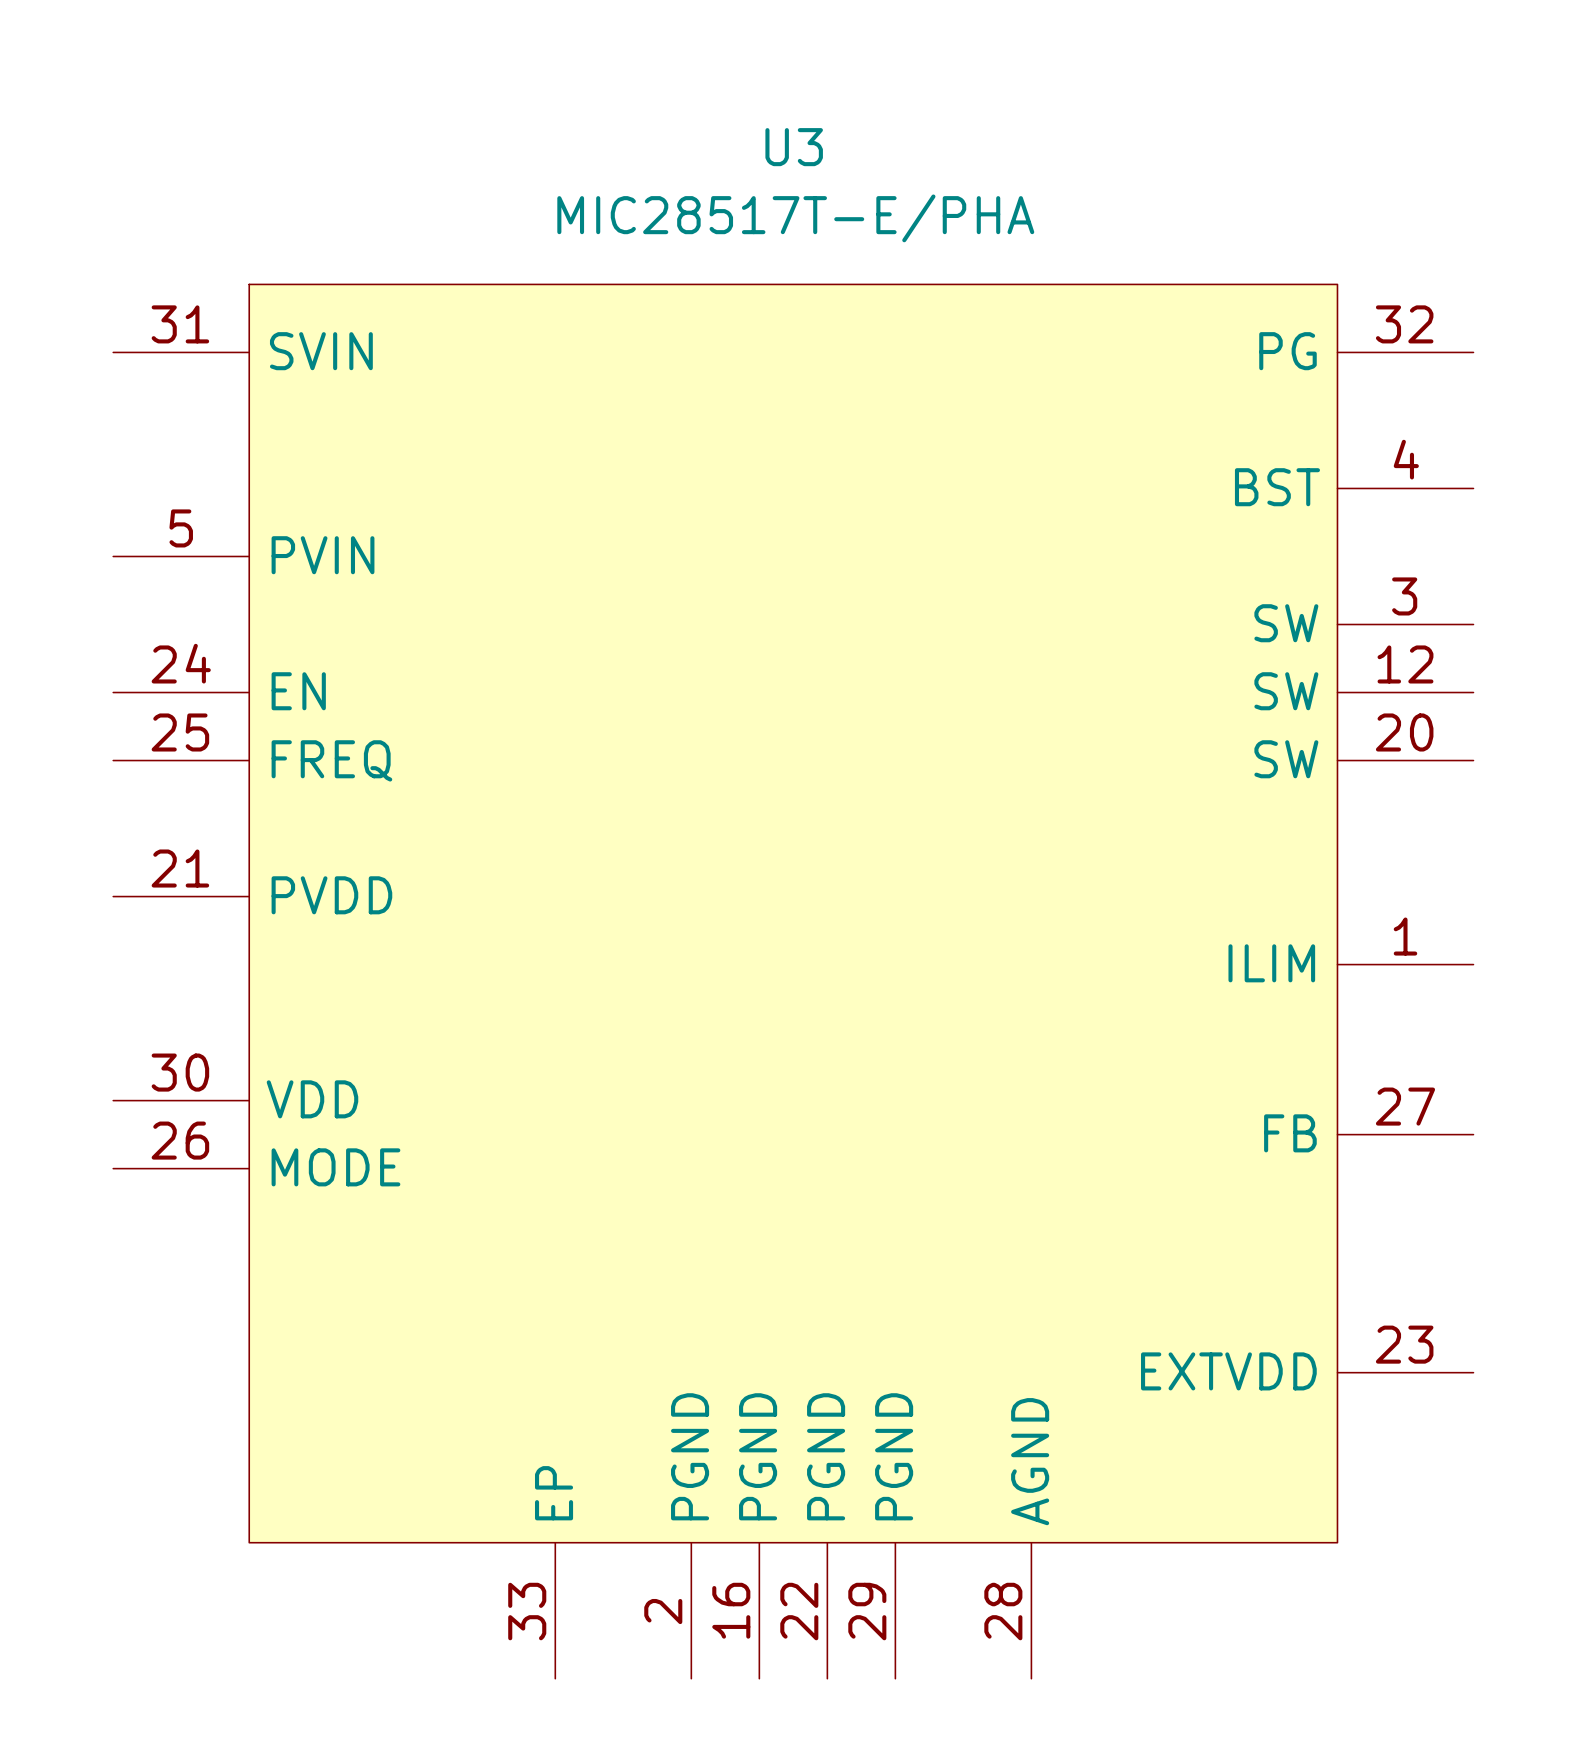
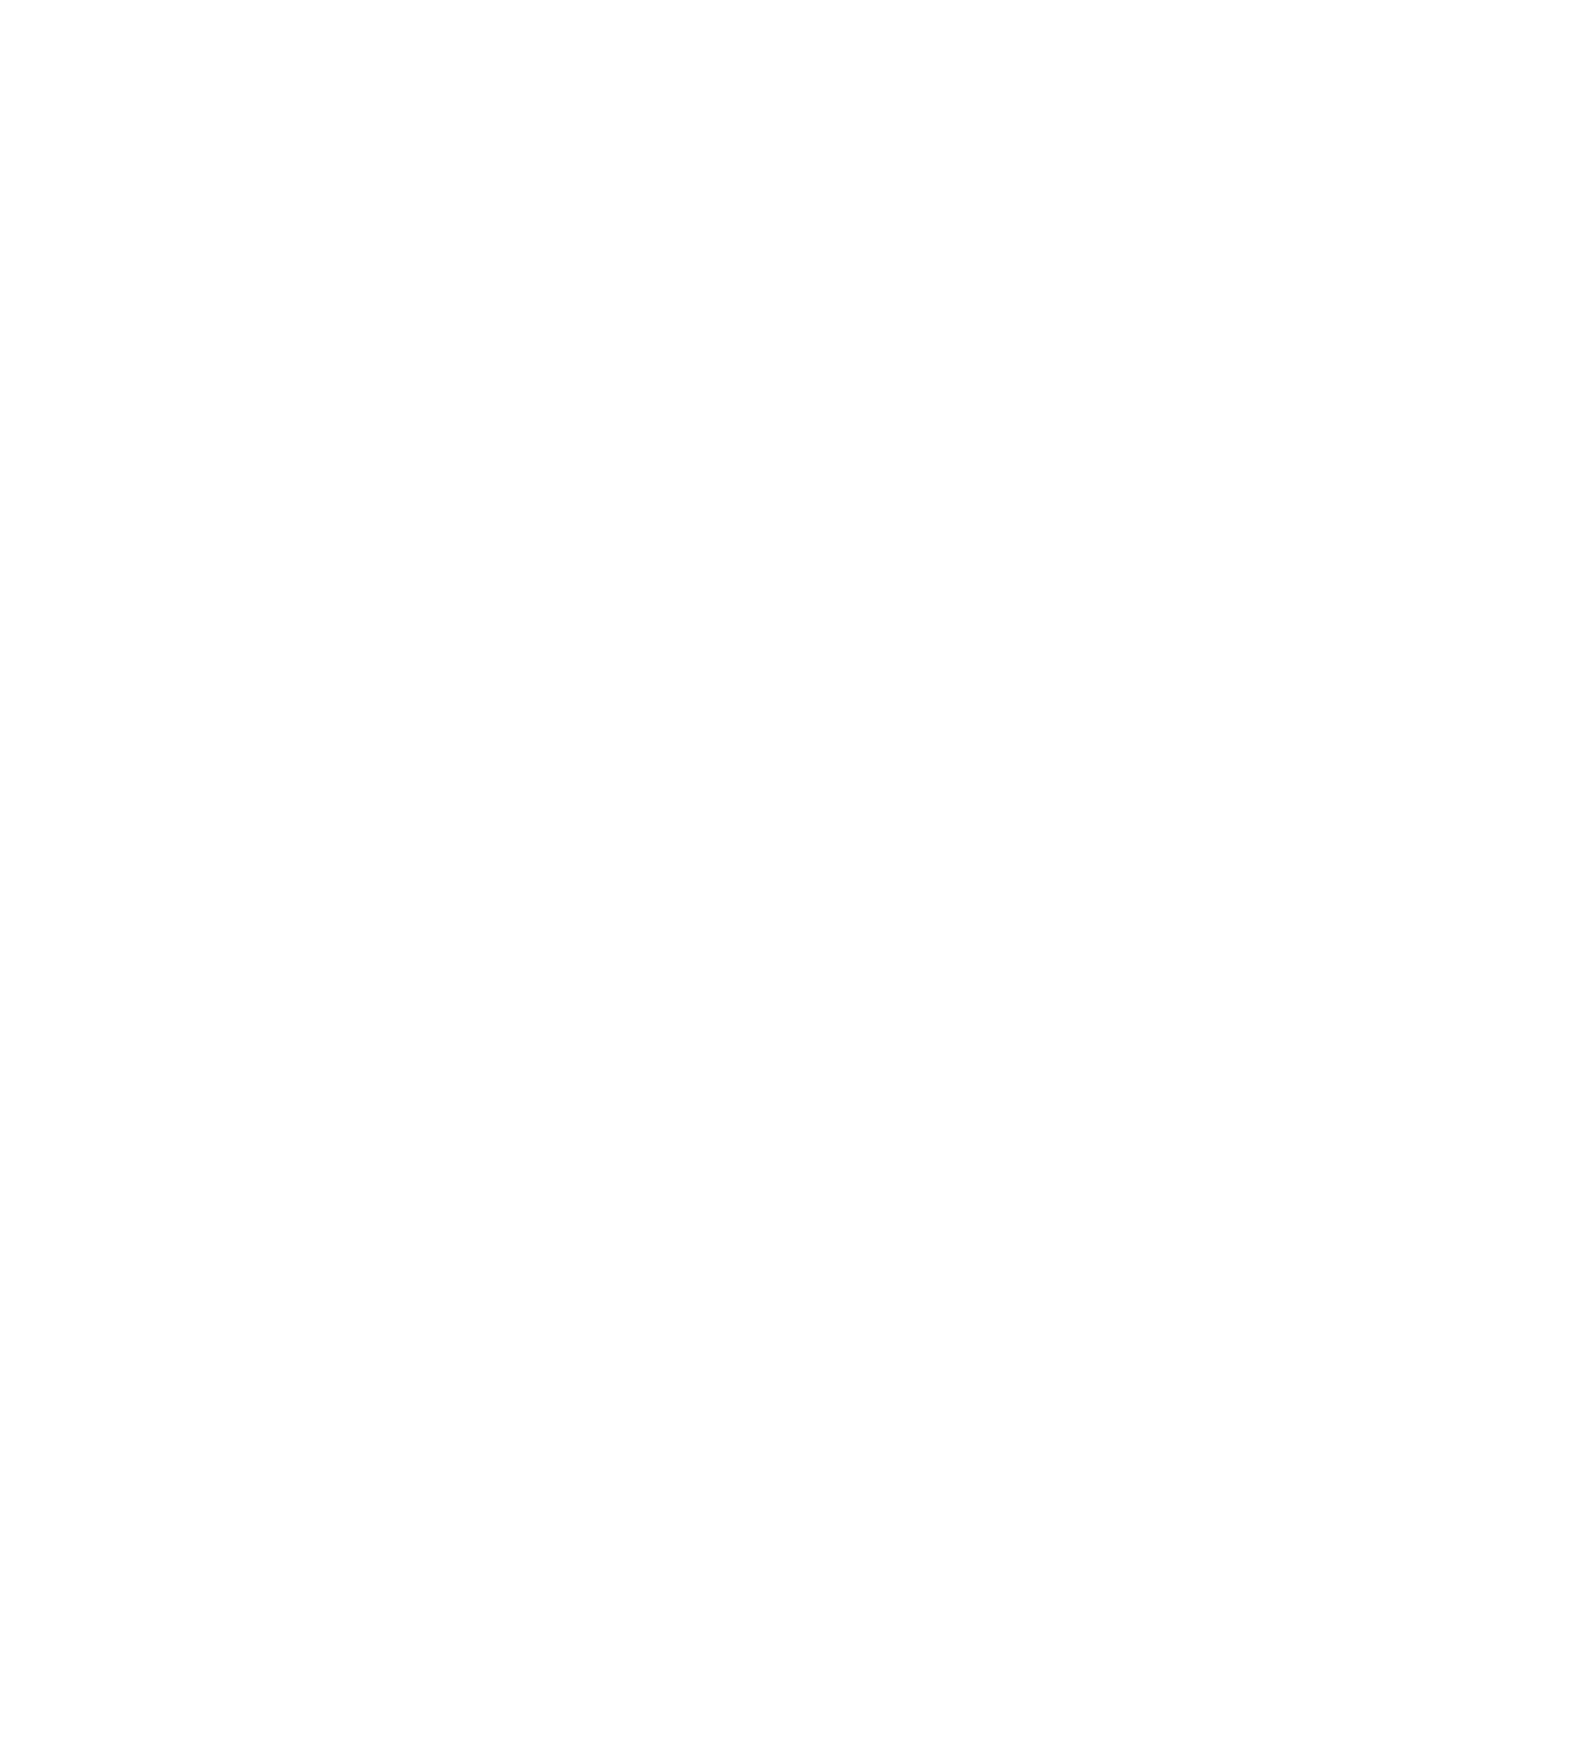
U3: MIC28517T-E/PHA (793, 981) -> none

